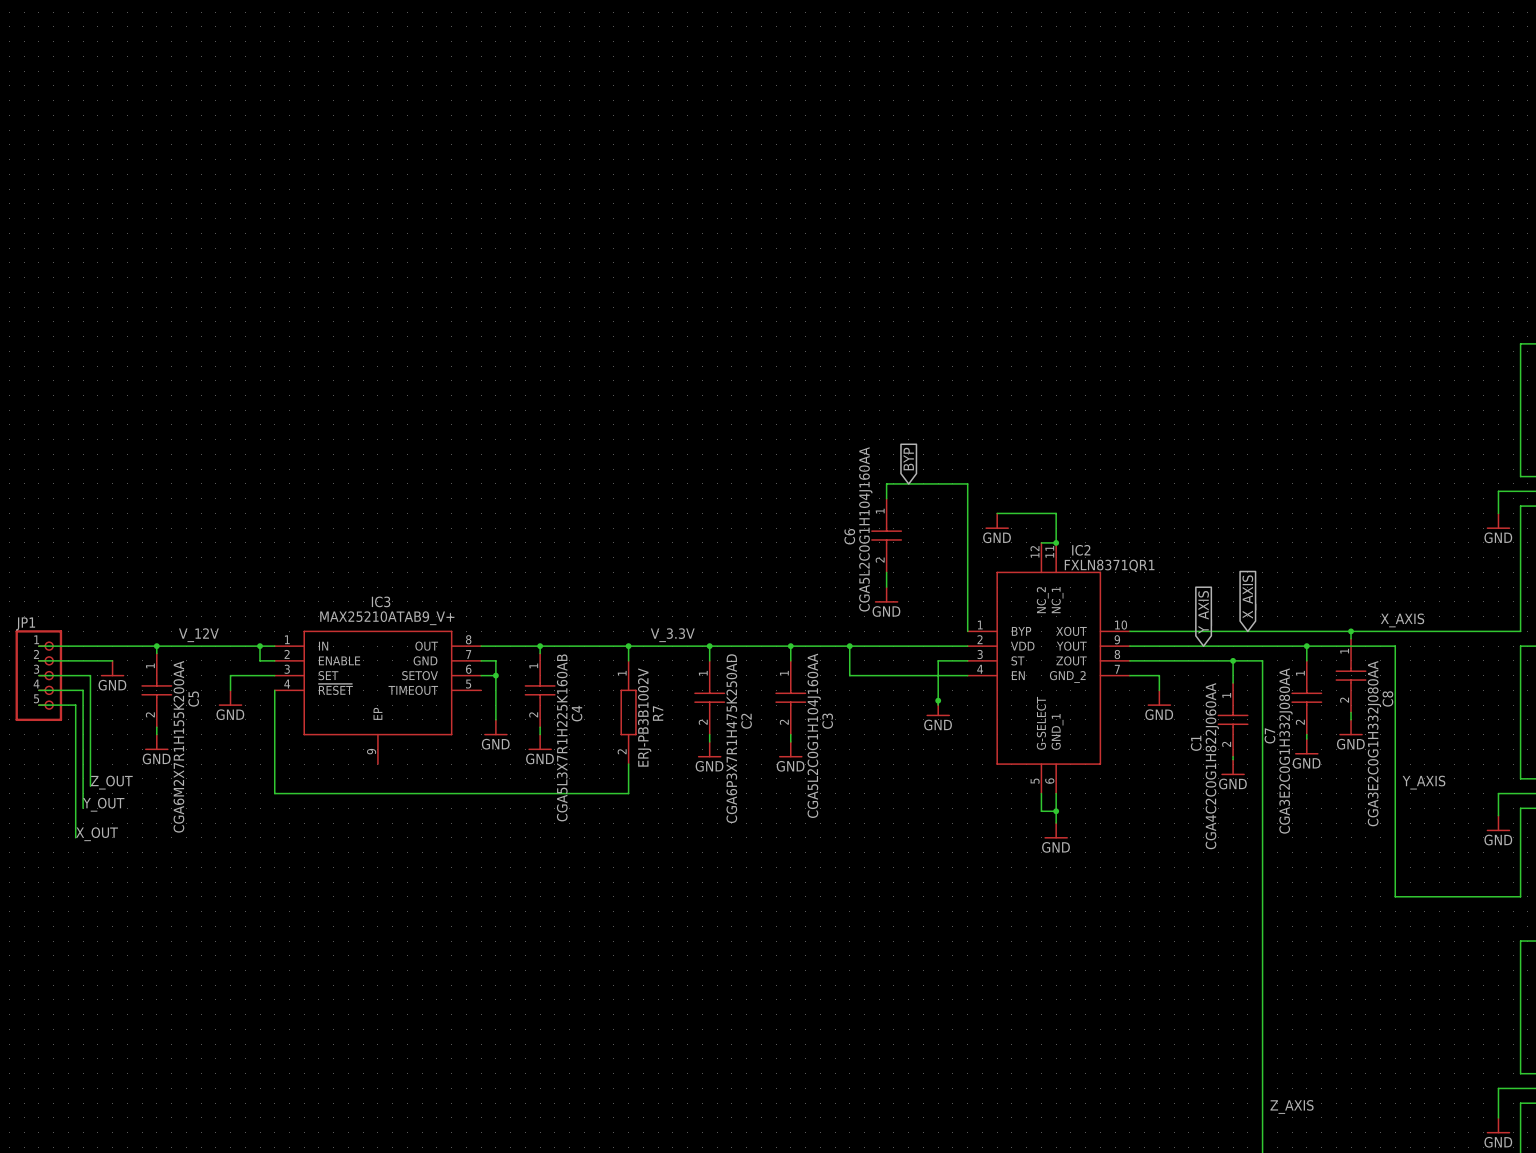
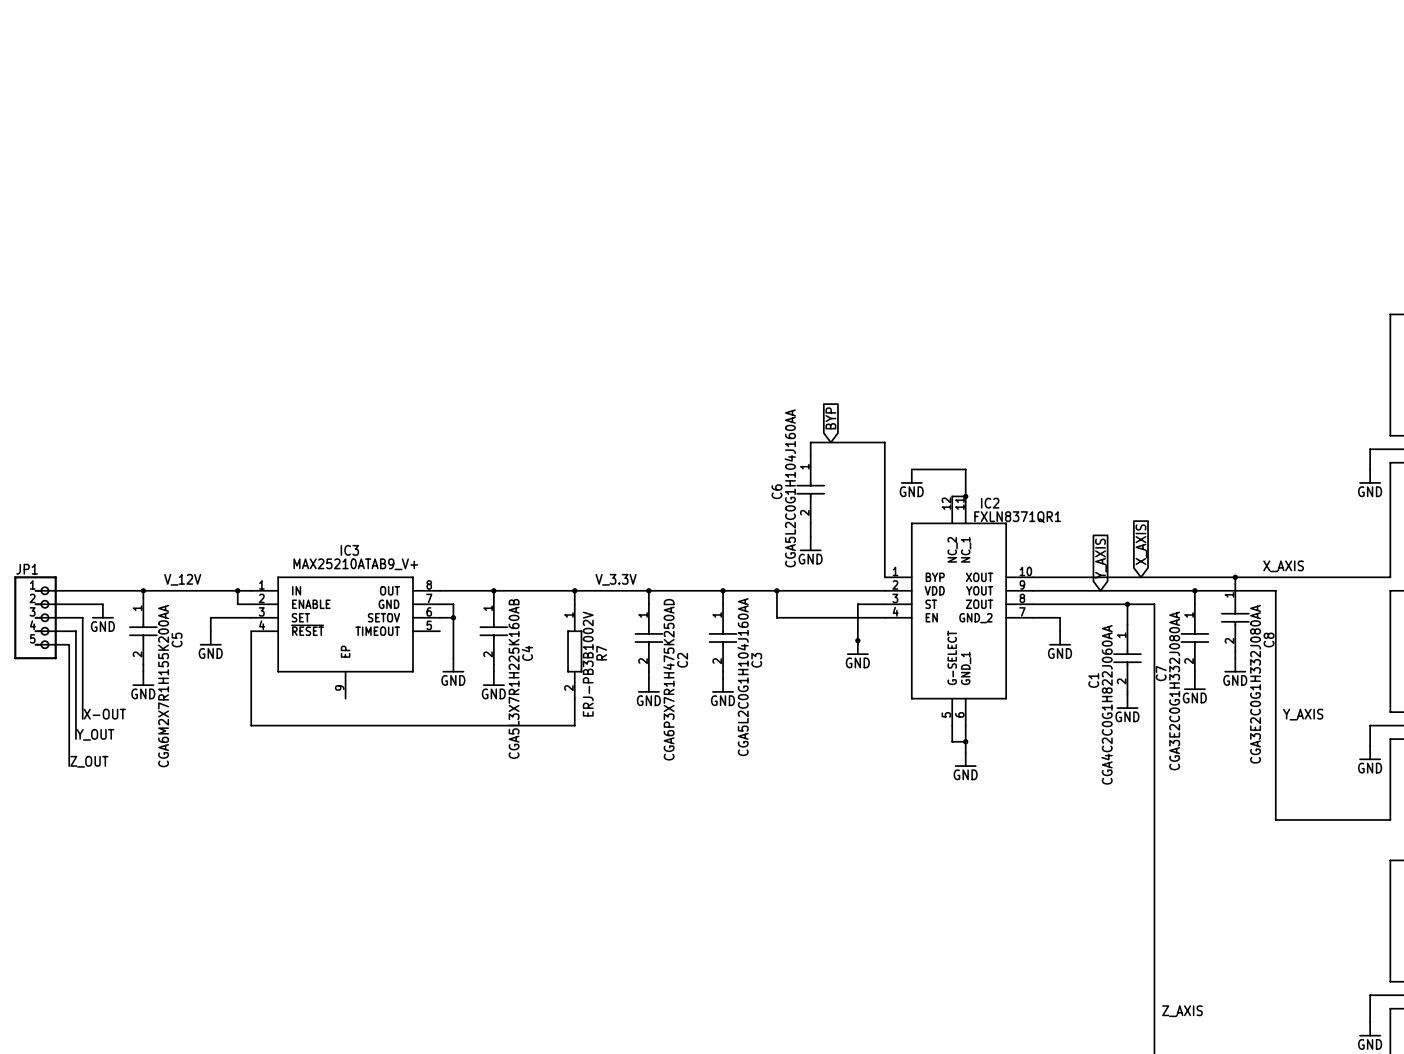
label: Z_OUT (111, 782) -> X-OUT (104, 714)
label: X_OUT (97, 834) -> Z_OUT (89, 761)

